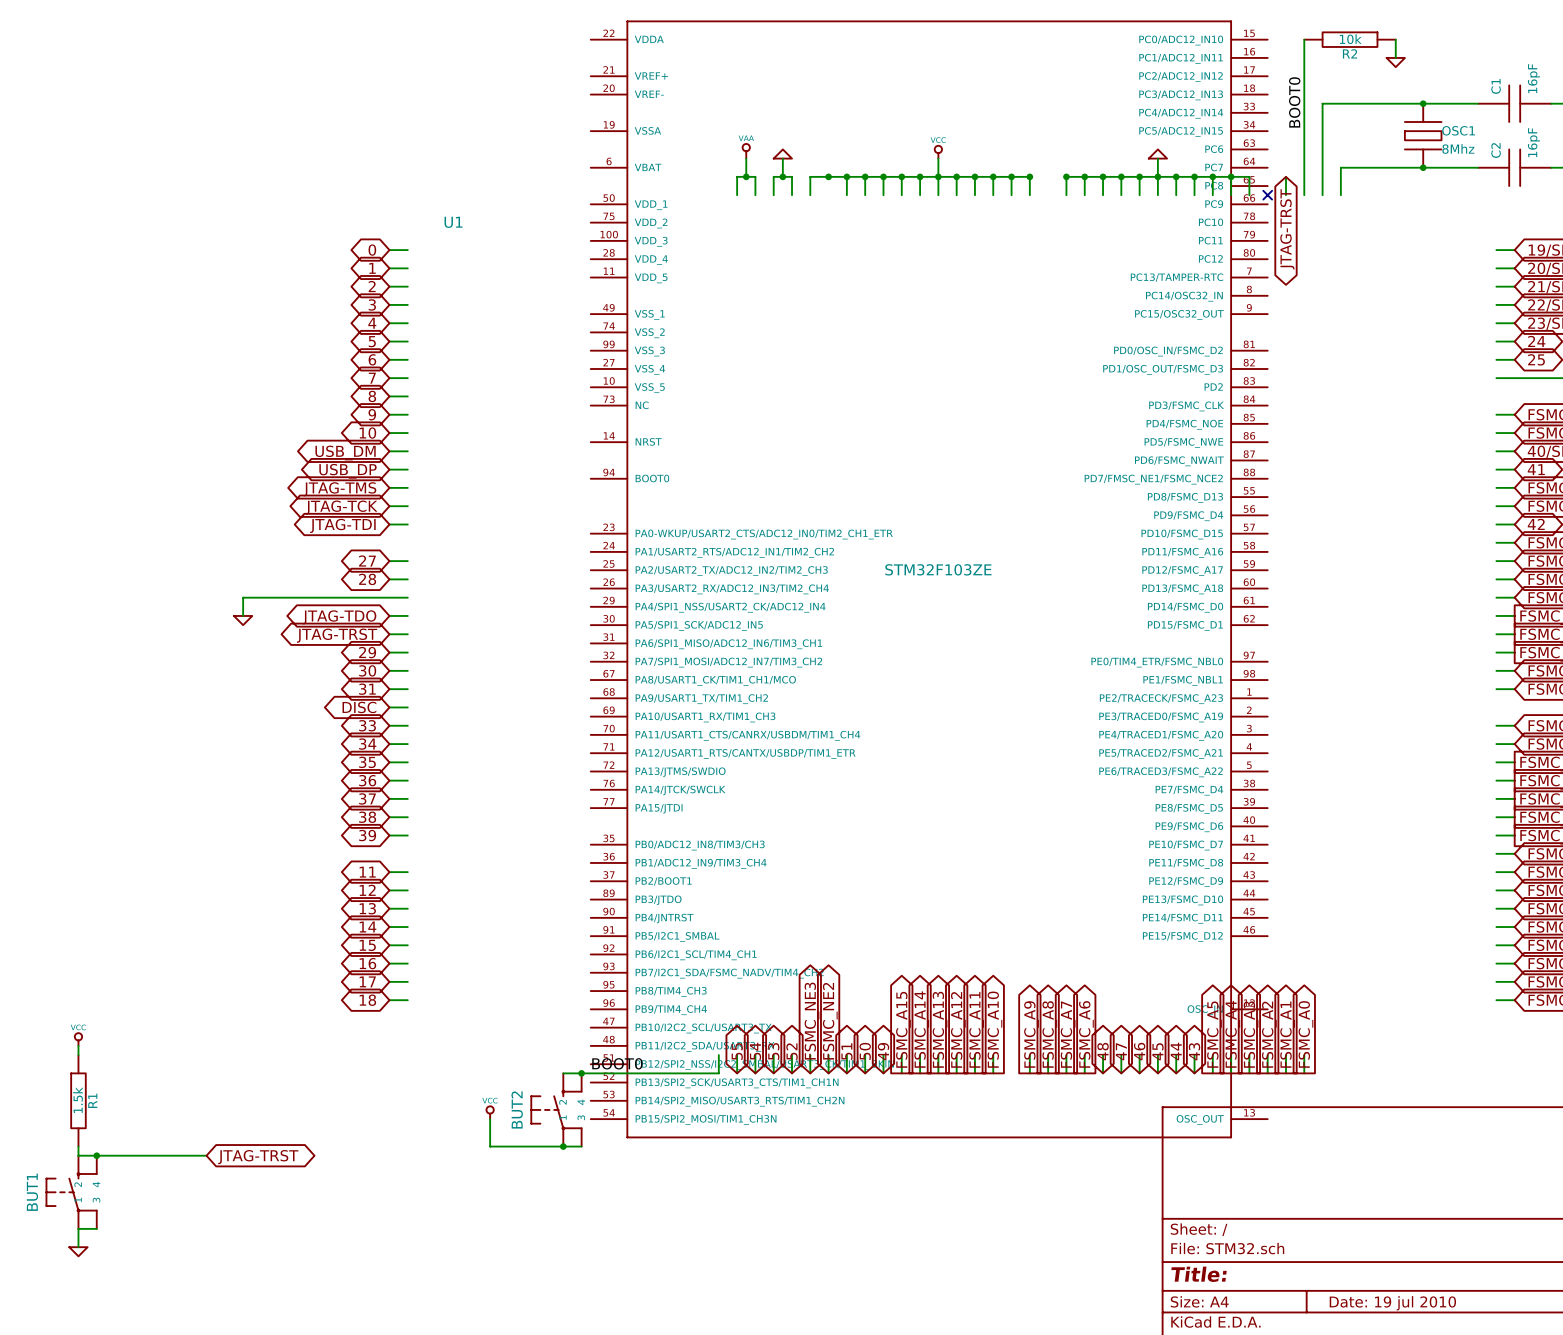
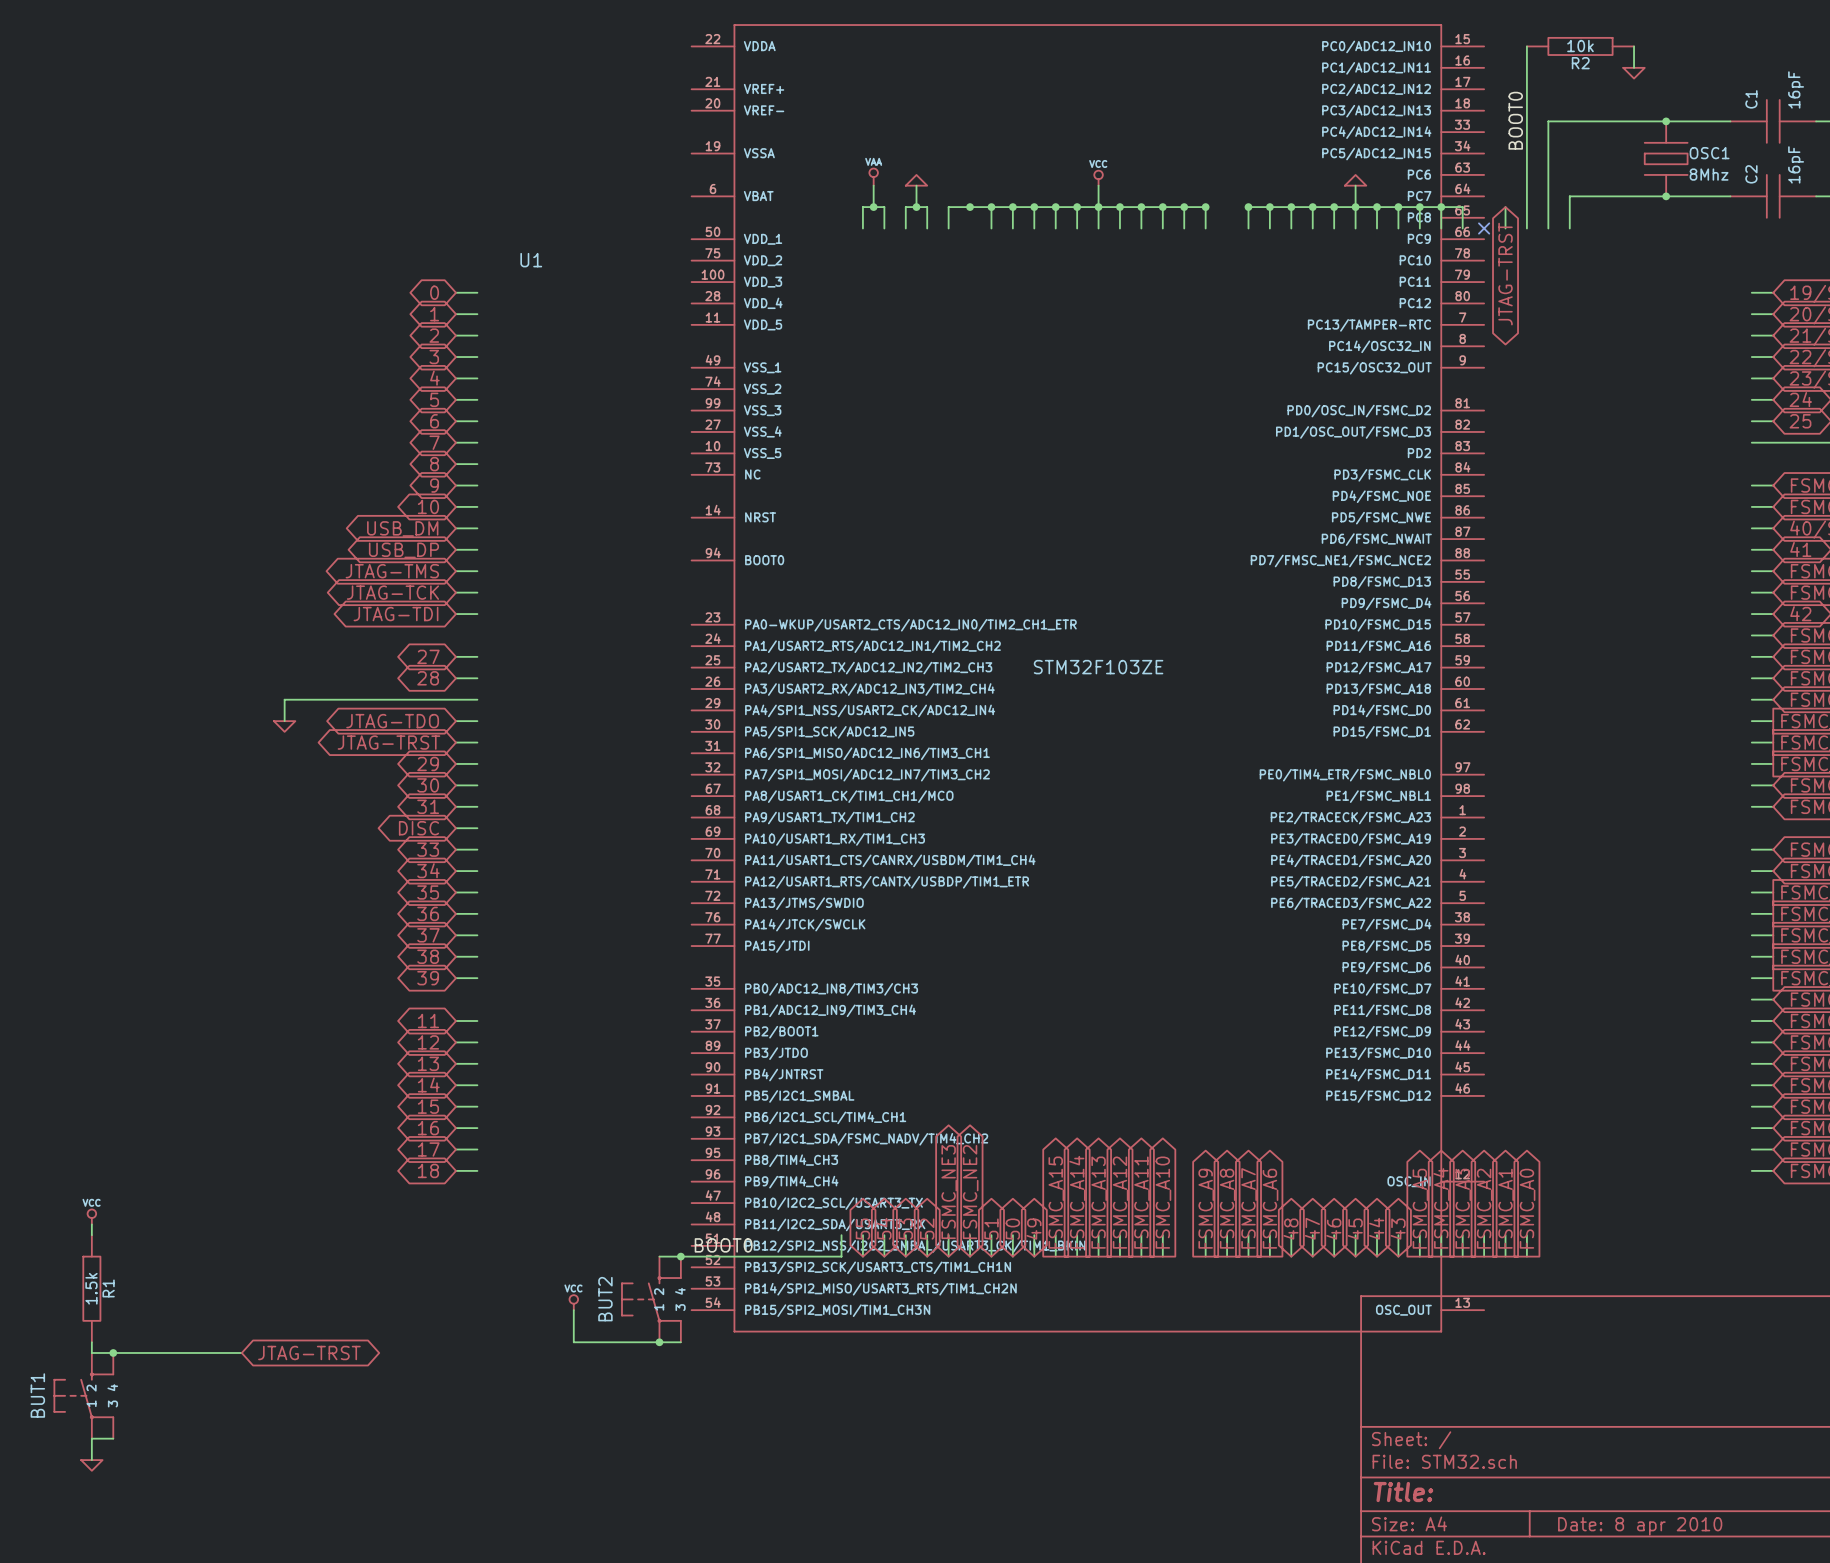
title block: Date: 19 jul 2010 (1392, 1303) -> Date: 8 apr 2010 (1640, 1526)

